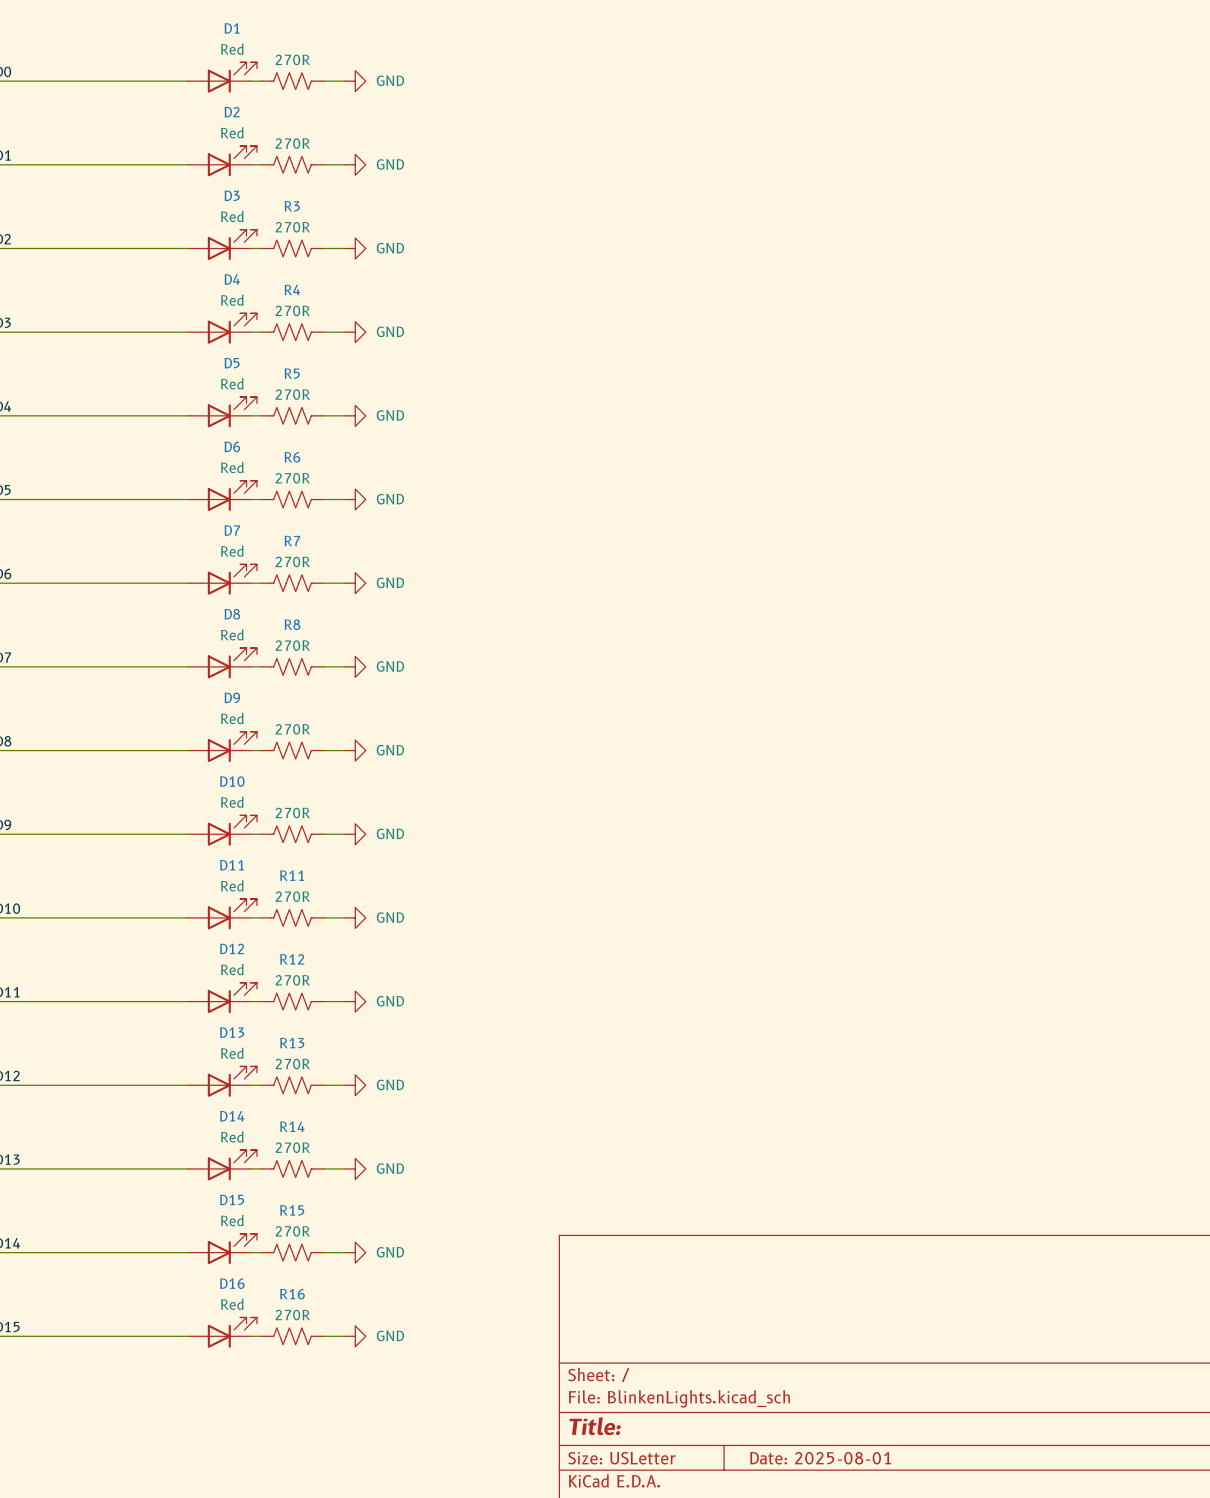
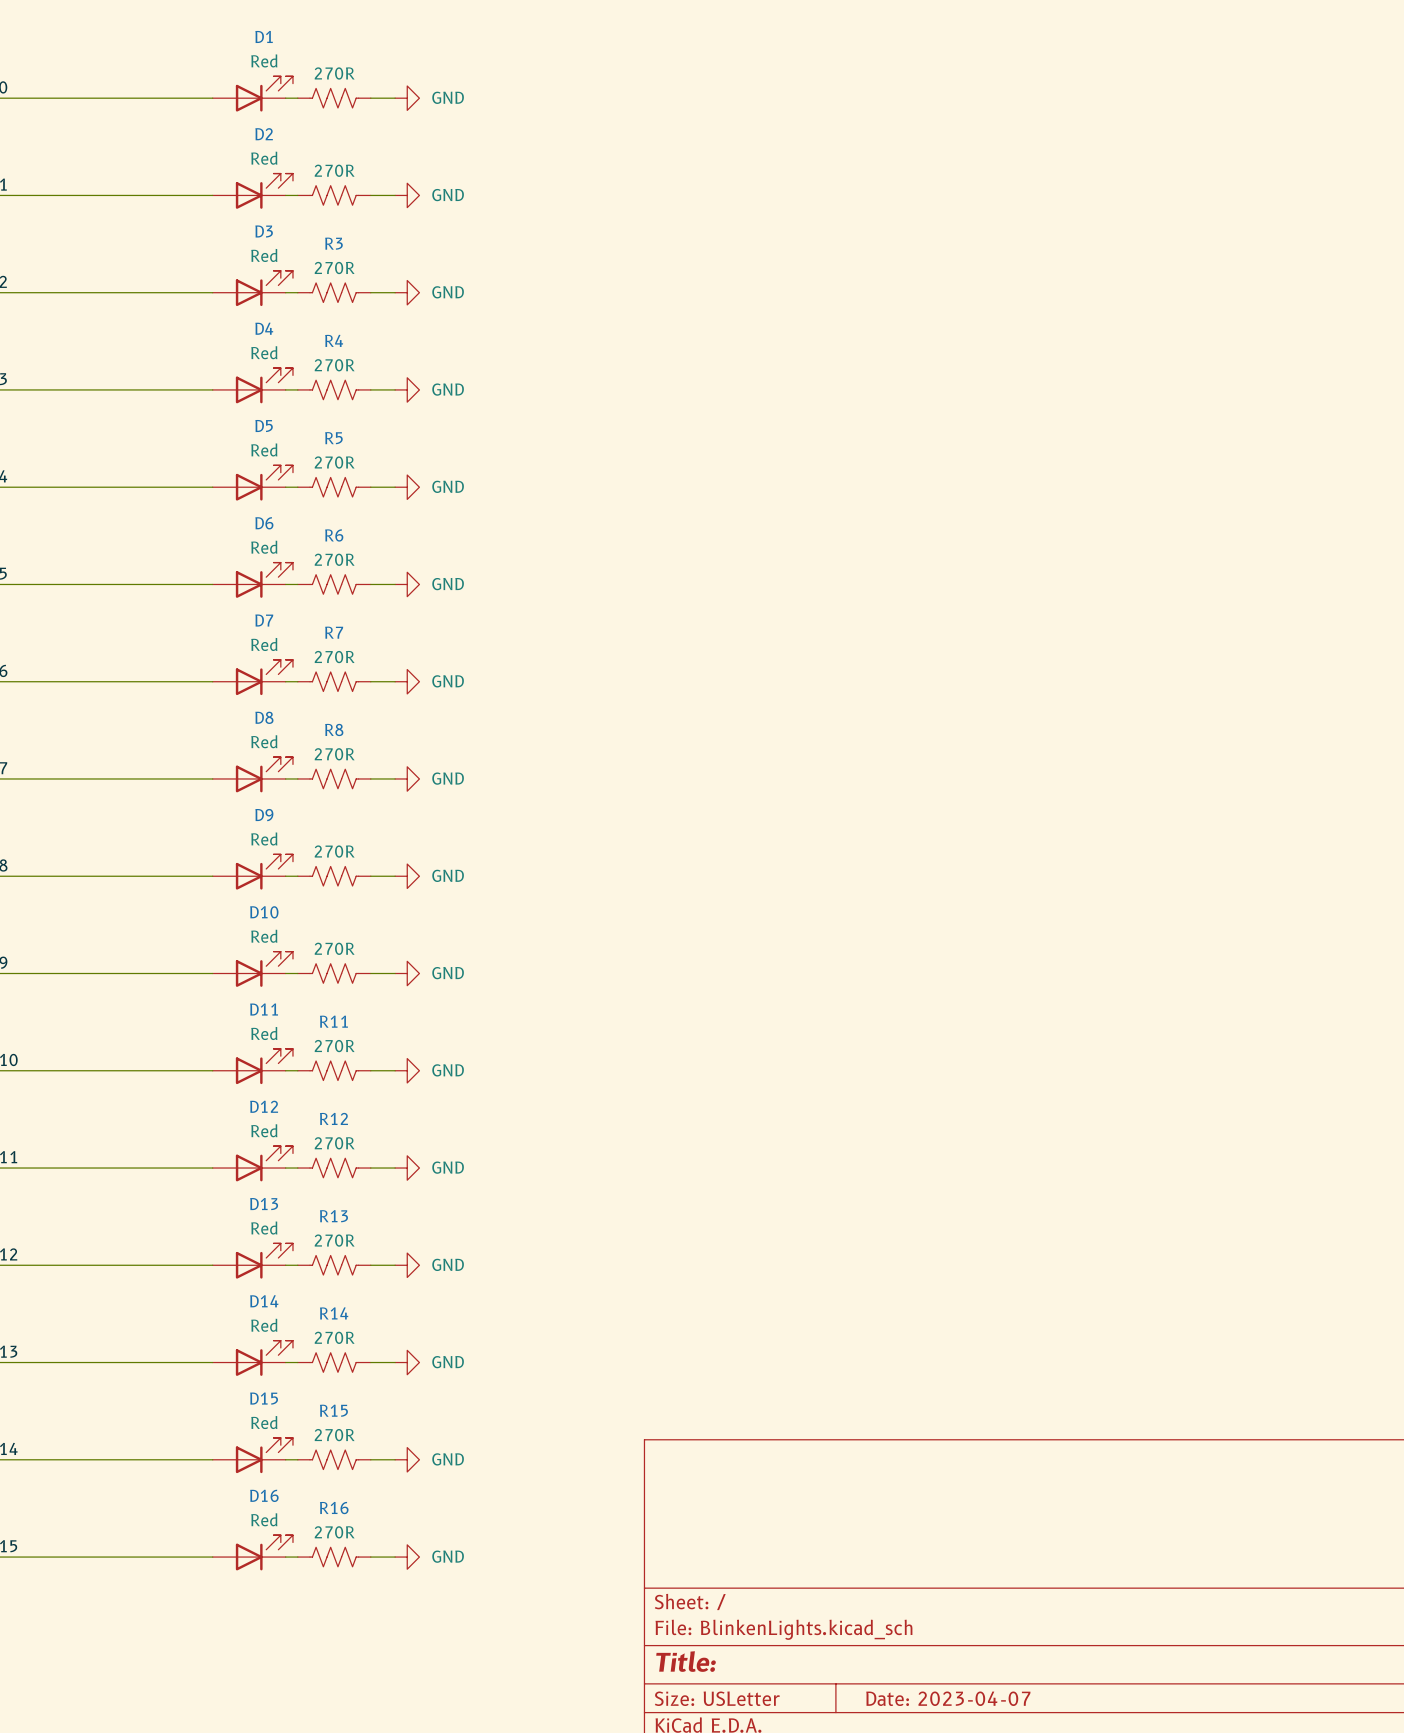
title block: Date: 2025-08-01 (820, 1458) -> Date: 2023-04-07 (948, 1698)

